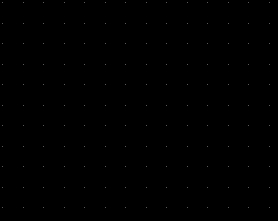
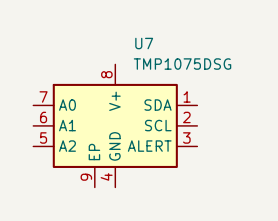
U7: none -> TMP1075DSG (115, 125)

